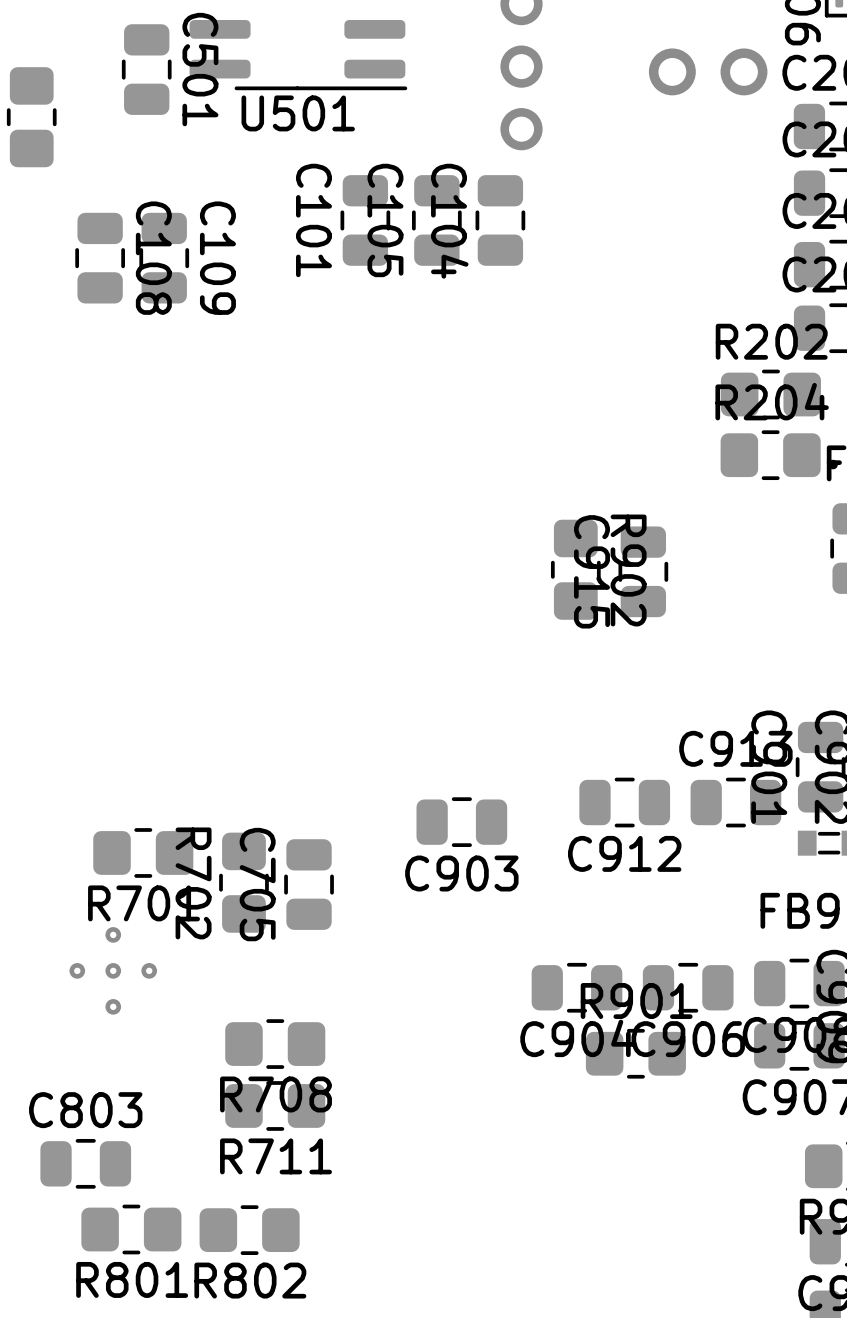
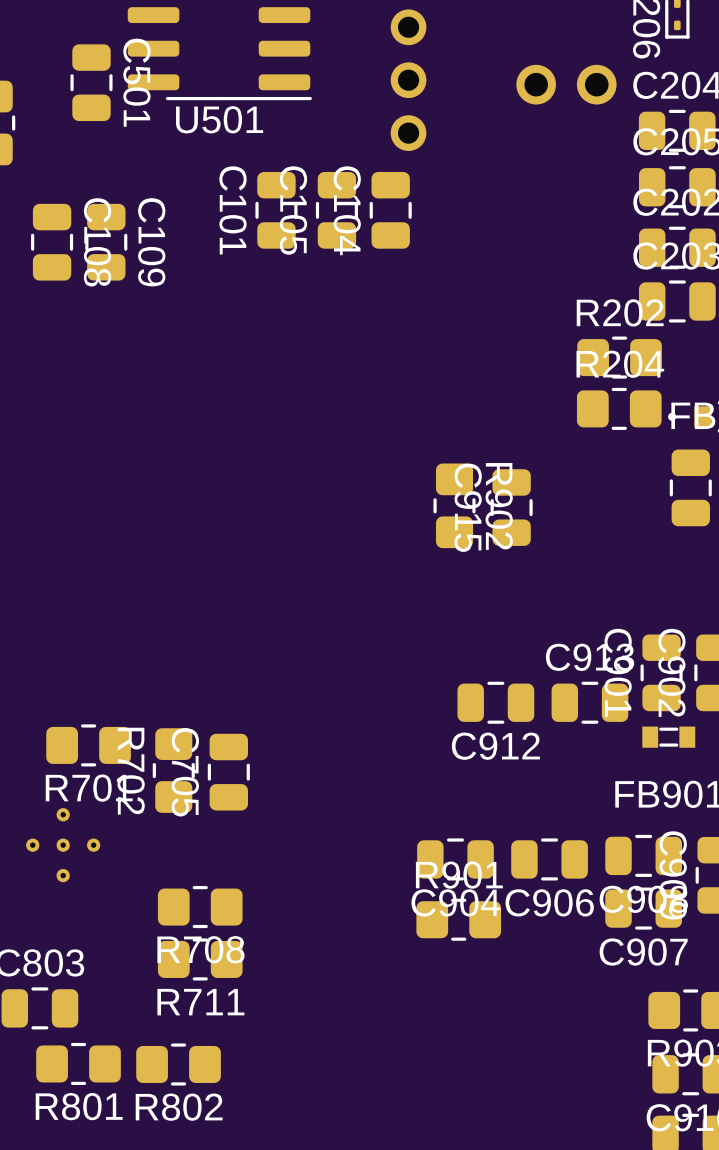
C903: (461, 822) -> none
R901 position: (635, 1053) -> (458, 919)

